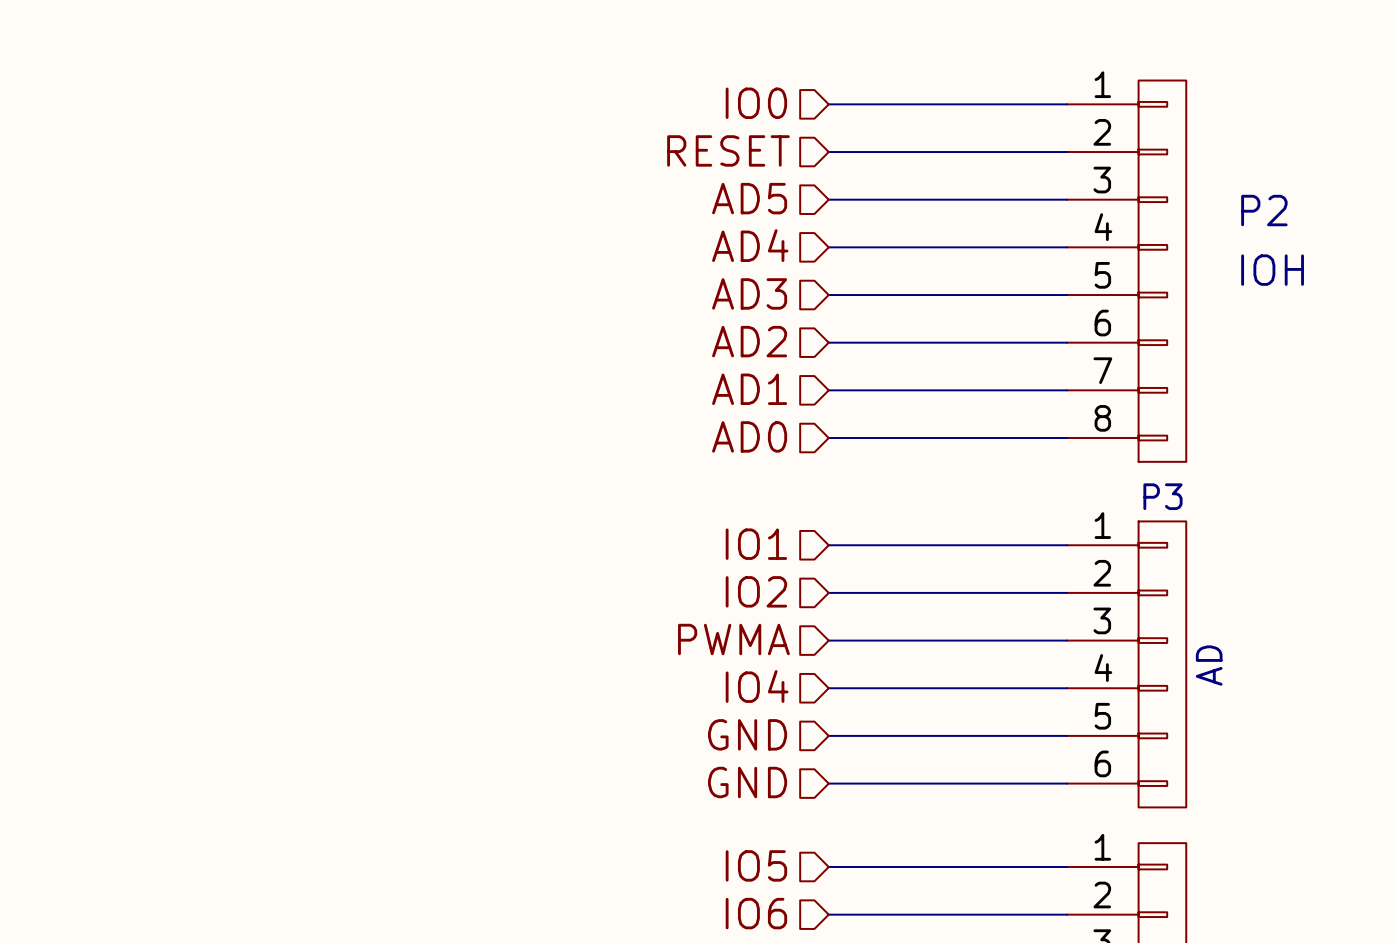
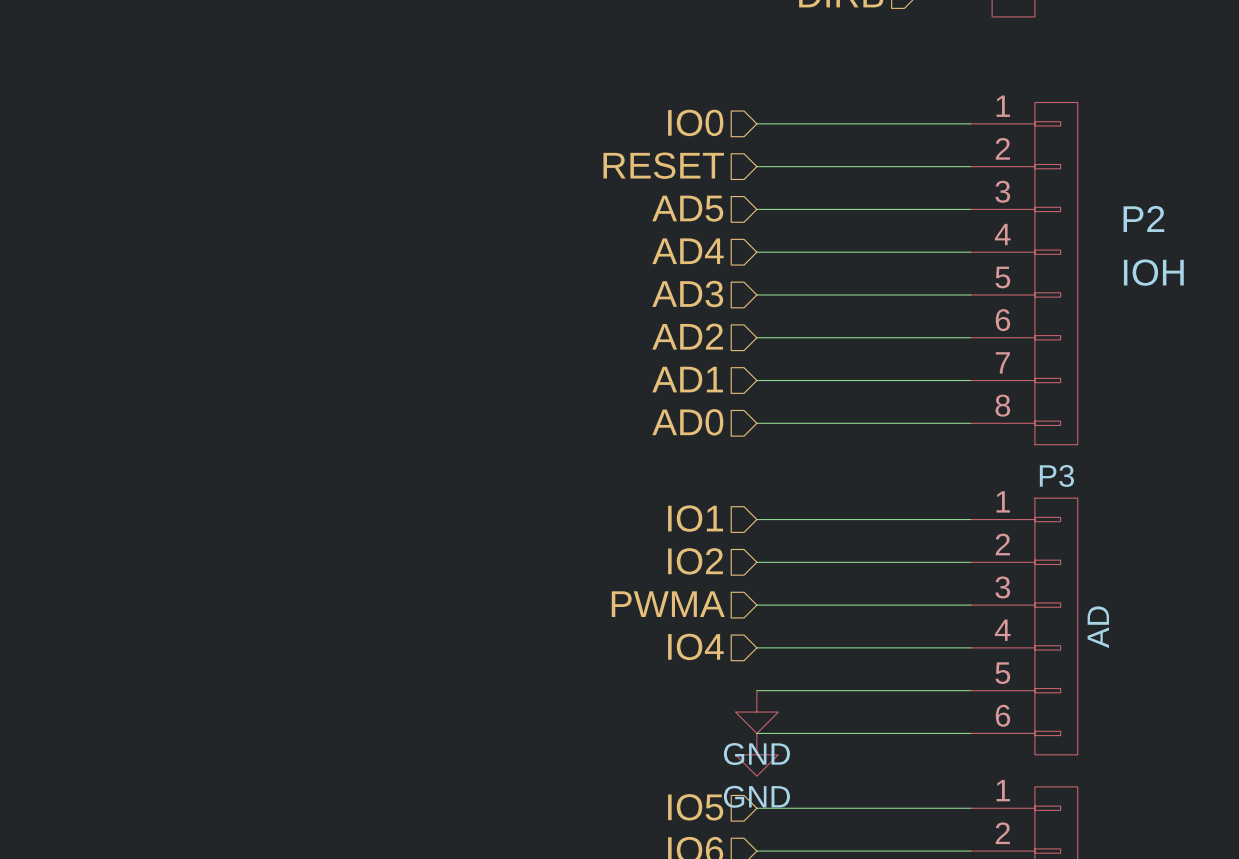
hierarchical label: GND (747, 734) -> none
power symbol: none -> GND (756, 712)
hierarchical label: GND (747, 782) -> none
power symbol: none -> GND (756, 754)

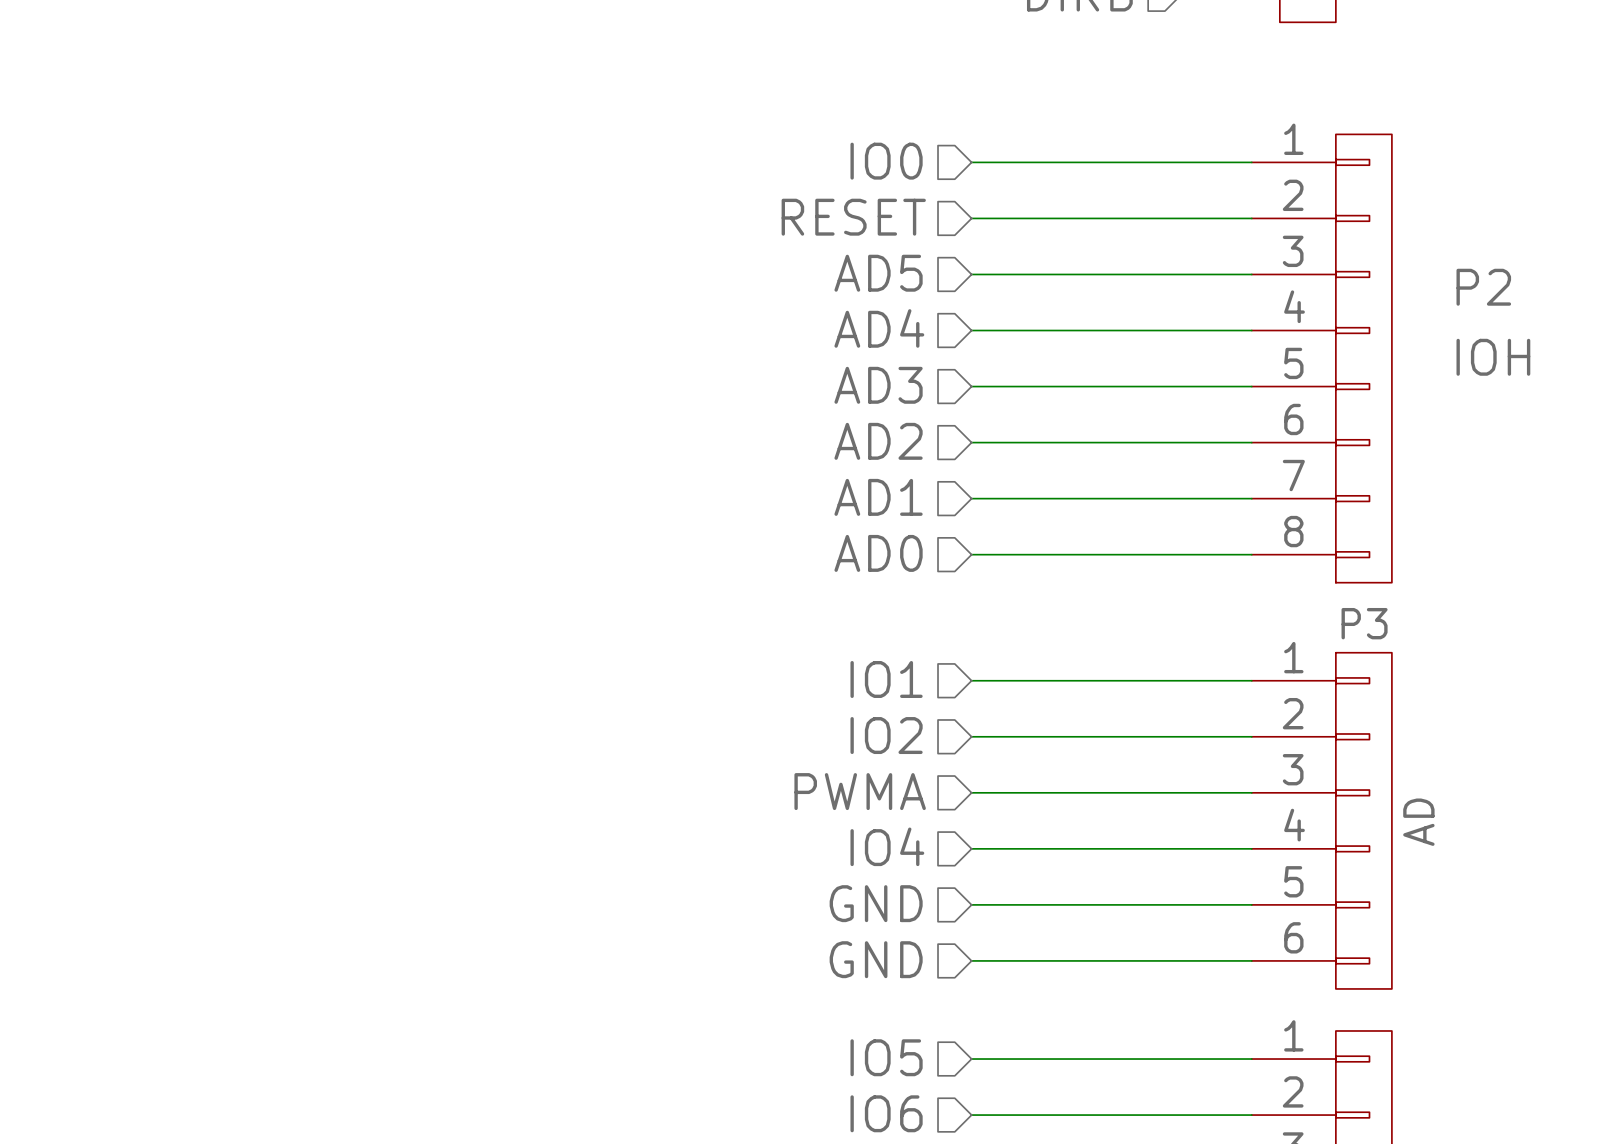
hierarchical label: none -> GND (876, 903)
power symbol: GND (756, 712) -> none
hierarchical label: none -> GND (876, 959)
power symbol: GND (756, 754) -> none

